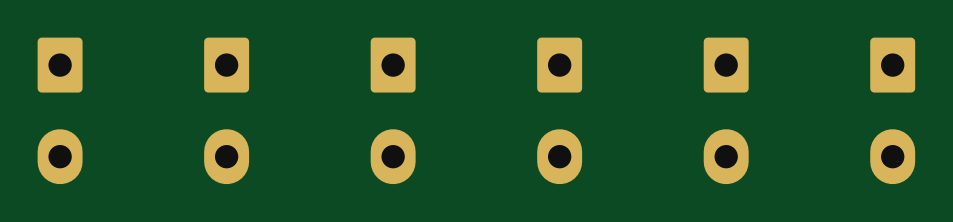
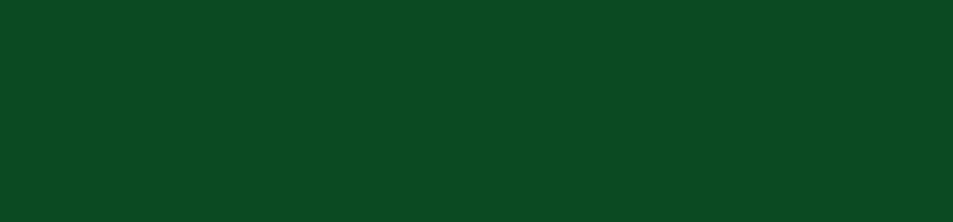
part: (60, 110) -> none
part: (226, 110) -> none
part: (393, 110) -> none
part: (559, 110) -> none
part: (726, 110) -> none
part: (892, 110) -> none

